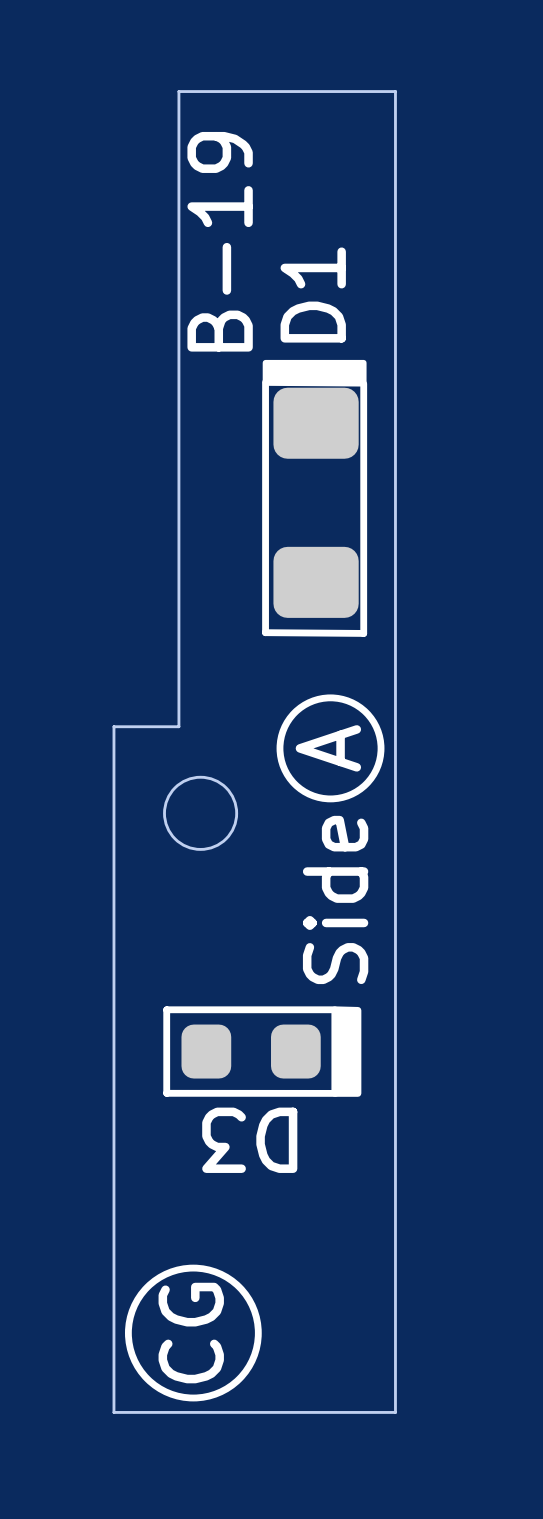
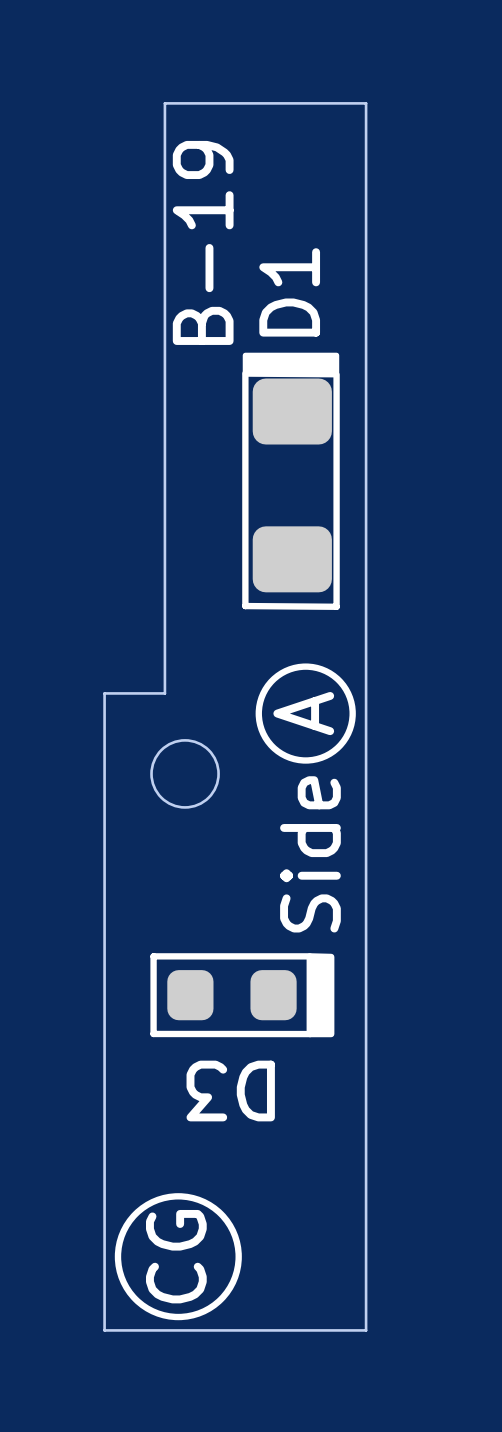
D3 name position: D3 (249, 1140) -> D3 (230, 1091)

